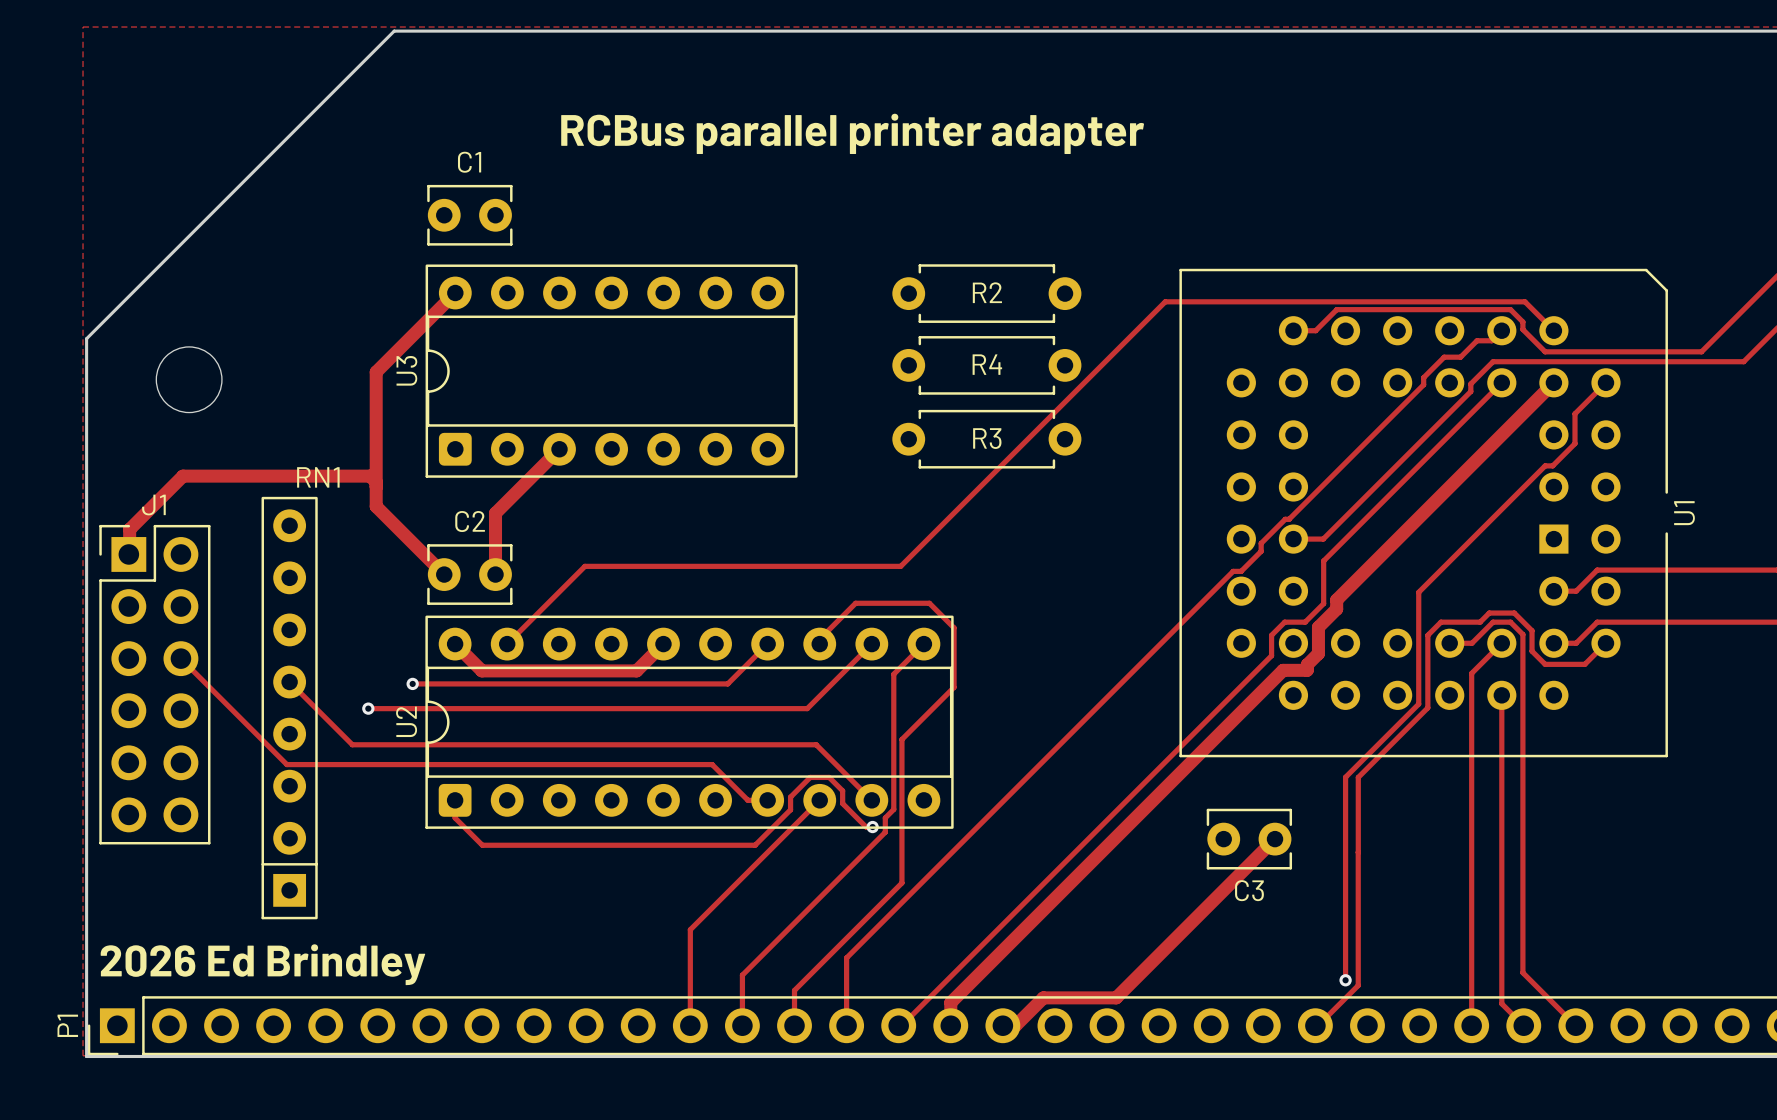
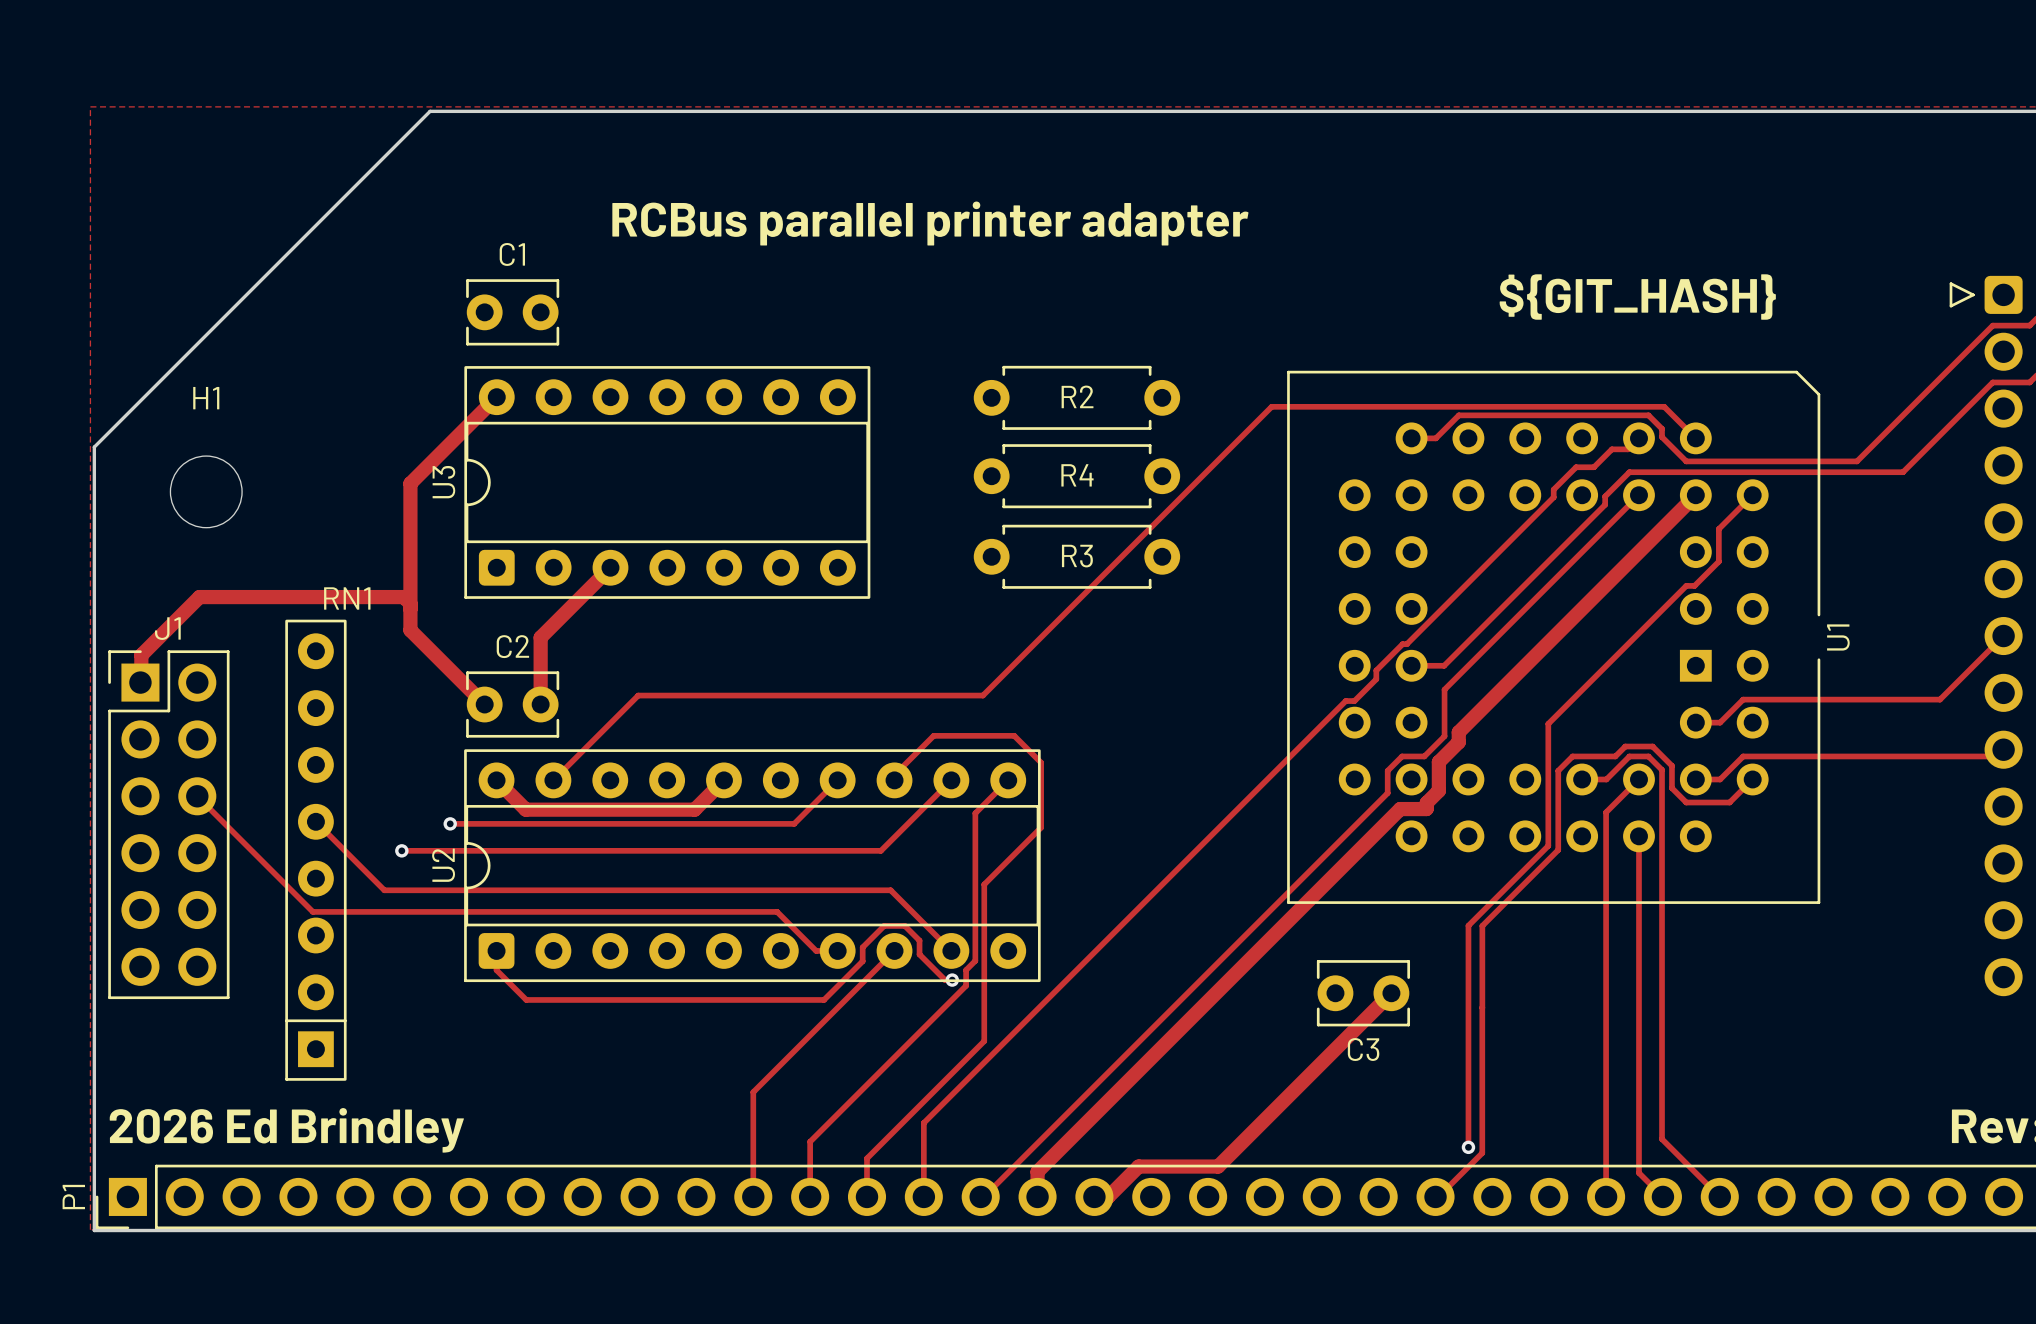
text: none -> ${GIT_HASH} (1637, 297)
H1 name: none -> H1 (206, 398)

